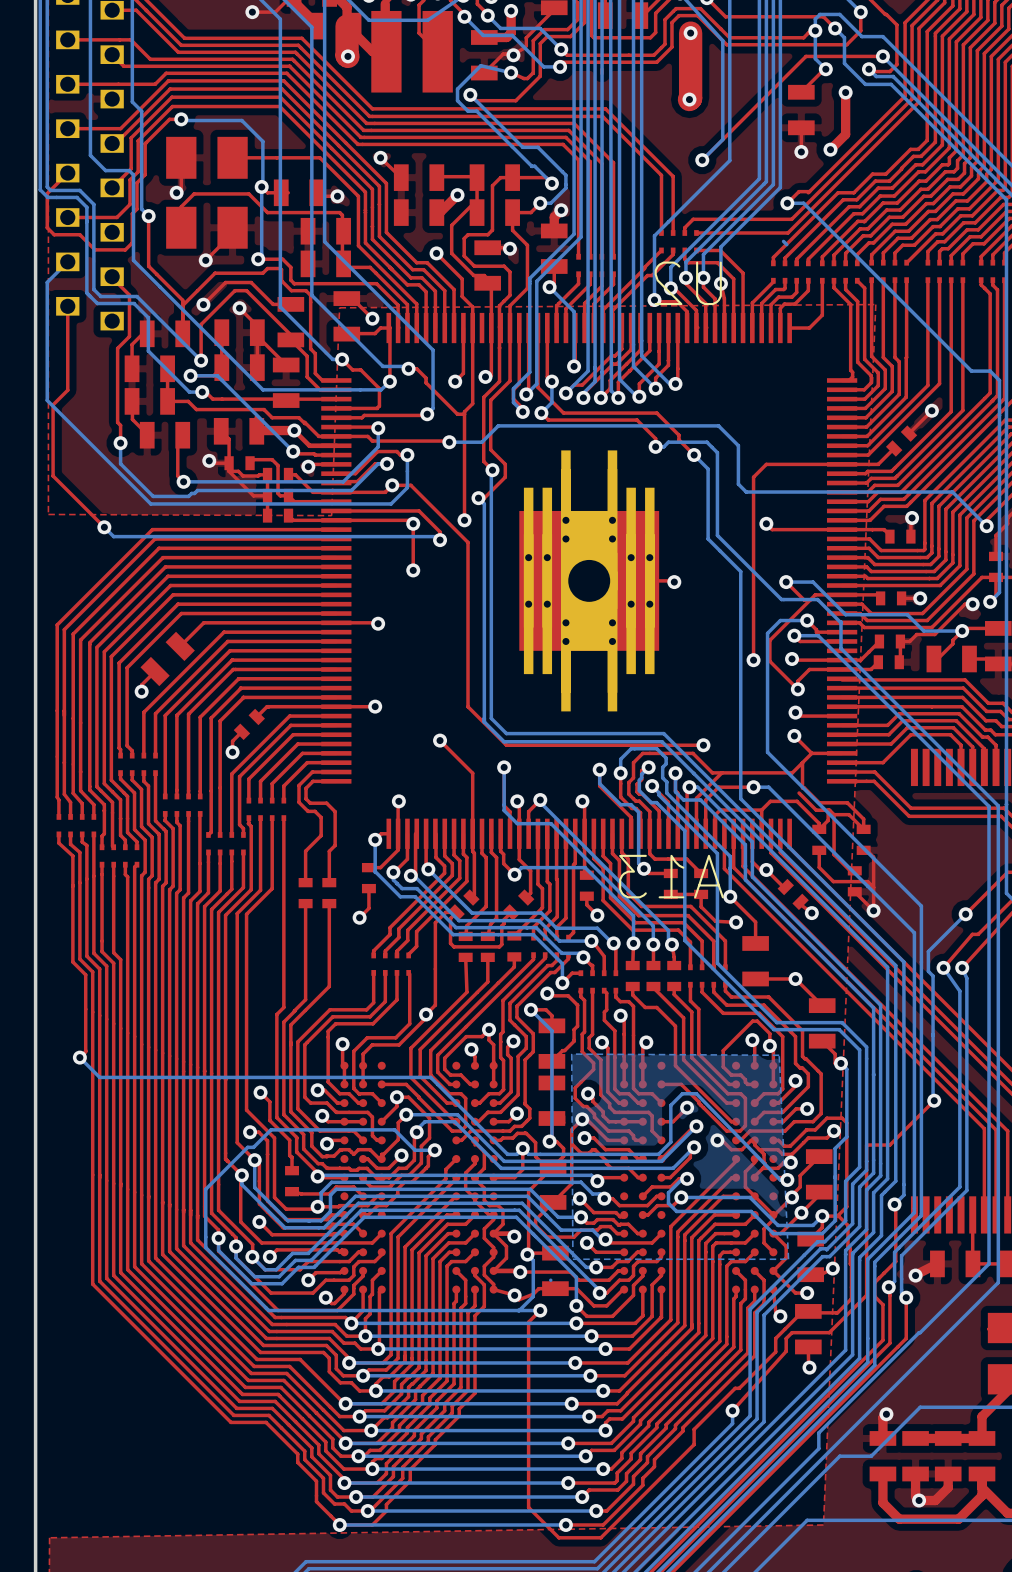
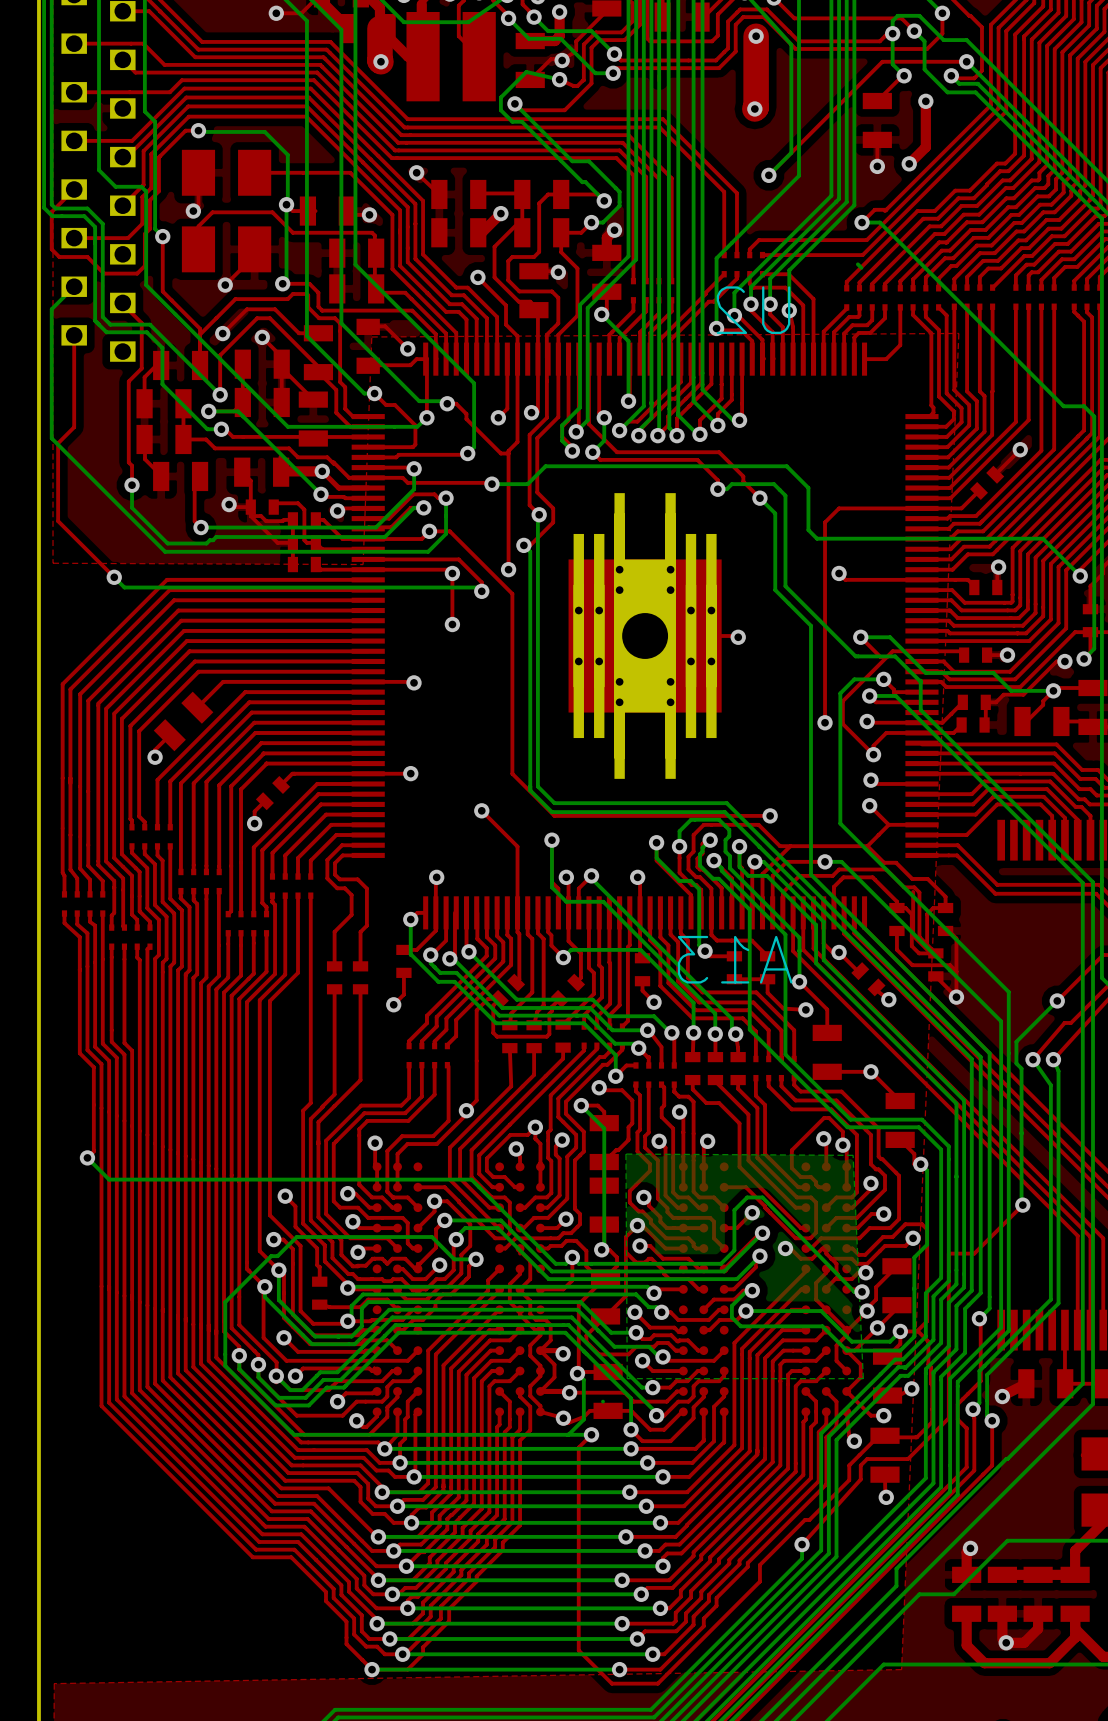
part footprint: [333, 291, 361, 342] -> [356, 318, 380, 374]
top track: (802, 762) (802, 788) (819, 802) (833, 802) -> (867, 846) (884, 862) (896, 862) (912, 878)
top track: (799, 793) (816, 810) (829, 810) (834, 814) (848, 814) (863, 829) -> (927, 944) (927, 914) (933, 908) (945, 908)
top track: (761, 810) (720, 810) -> (896, 908) (905, 908) (911, 914) (911, 946) (919, 953) (935, 953) (919, 937) (919, 892) (914, 887) (904, 887) (886, 869) (839, 869) (832, 875) (799, 875) (788, 886)
top track: (828, 810) (828, 820) (819, 829) -> none

